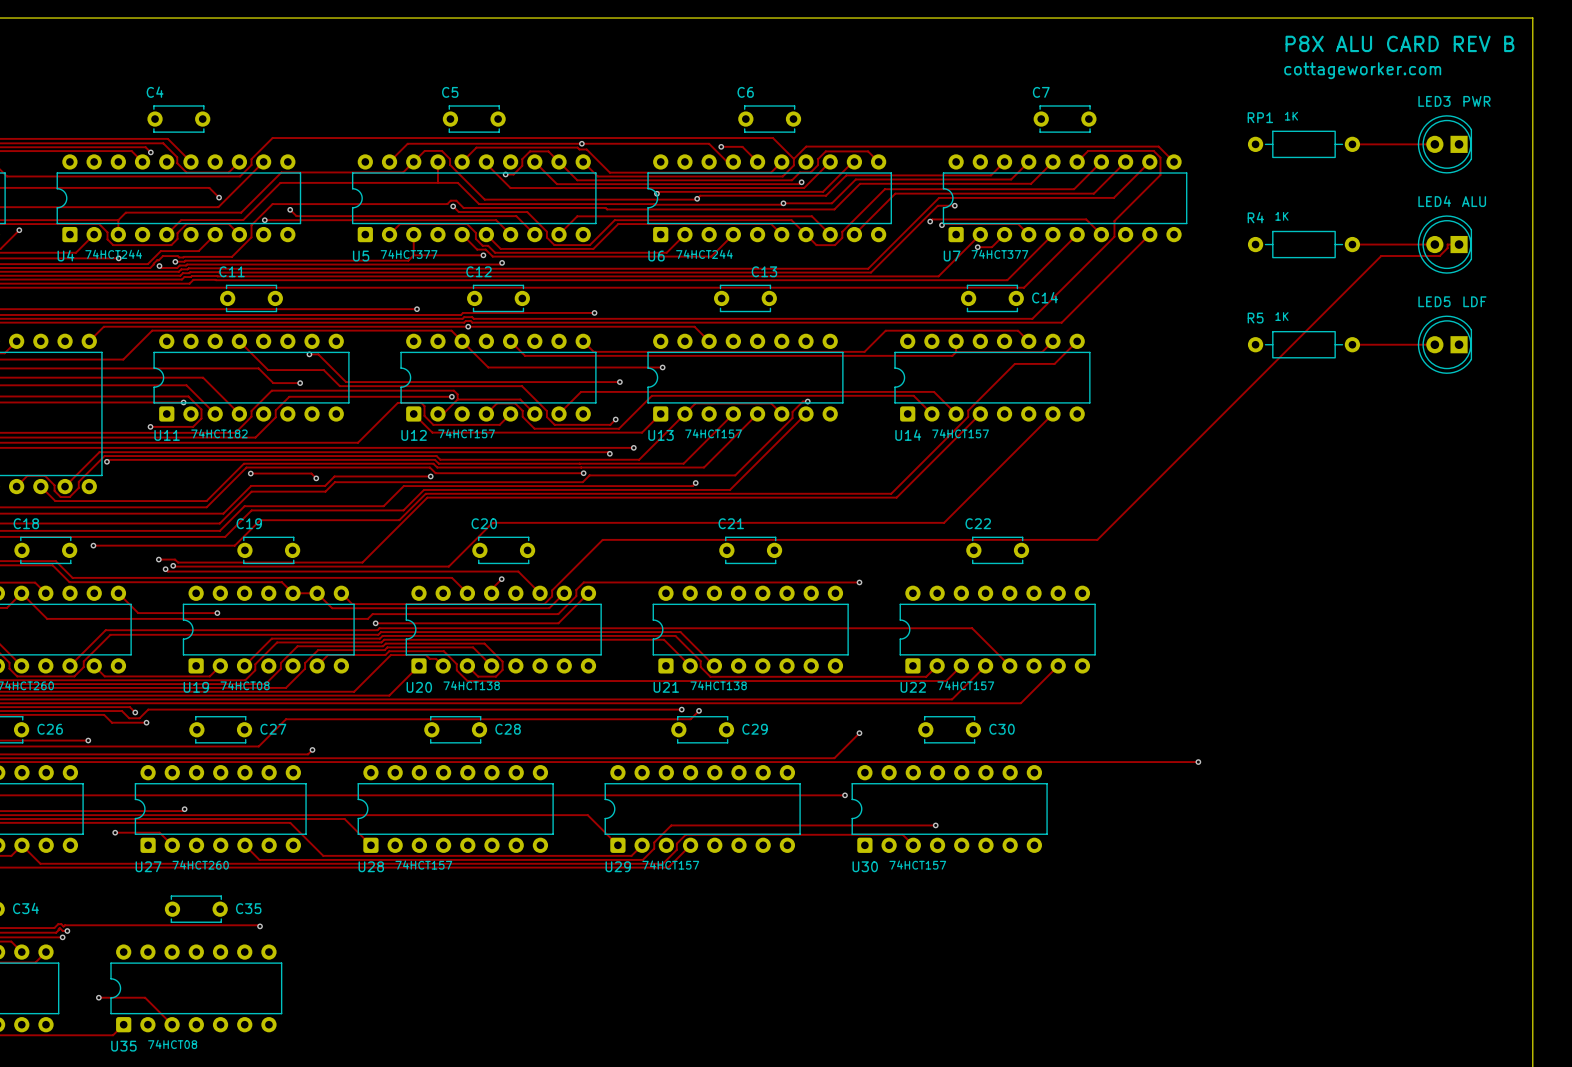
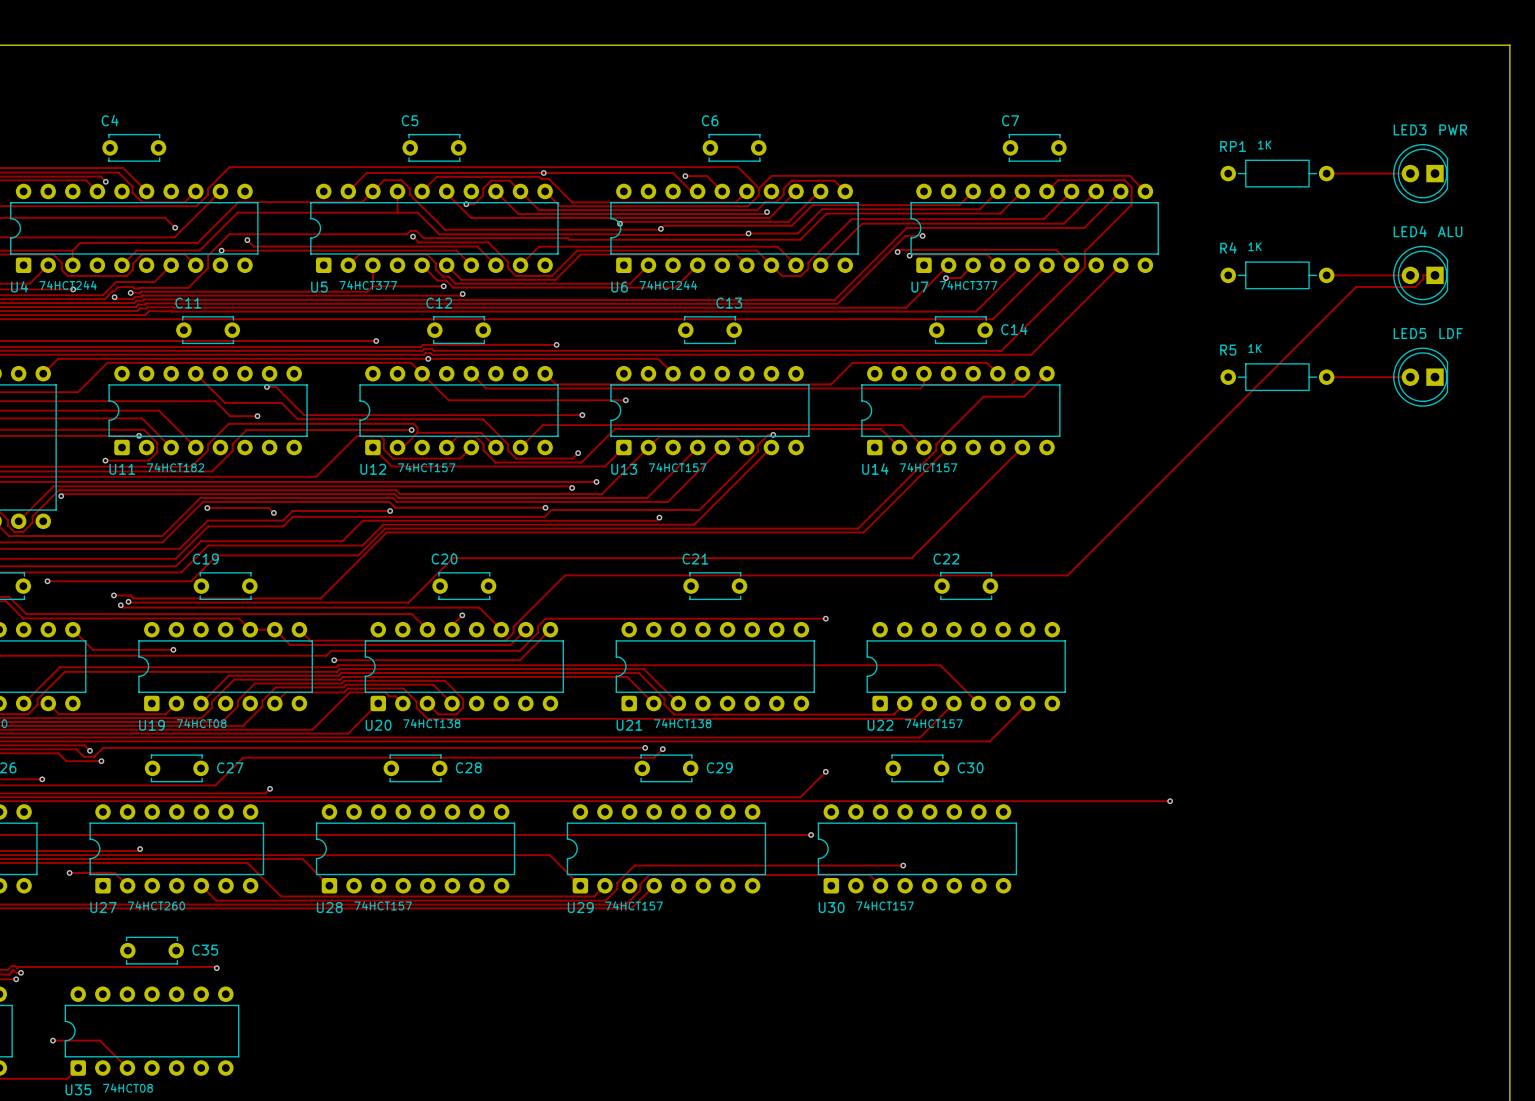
text: P8X ALU CARD REV B (1399, 43) -> none
text: cottageworker.com (1362, 70) -> none

